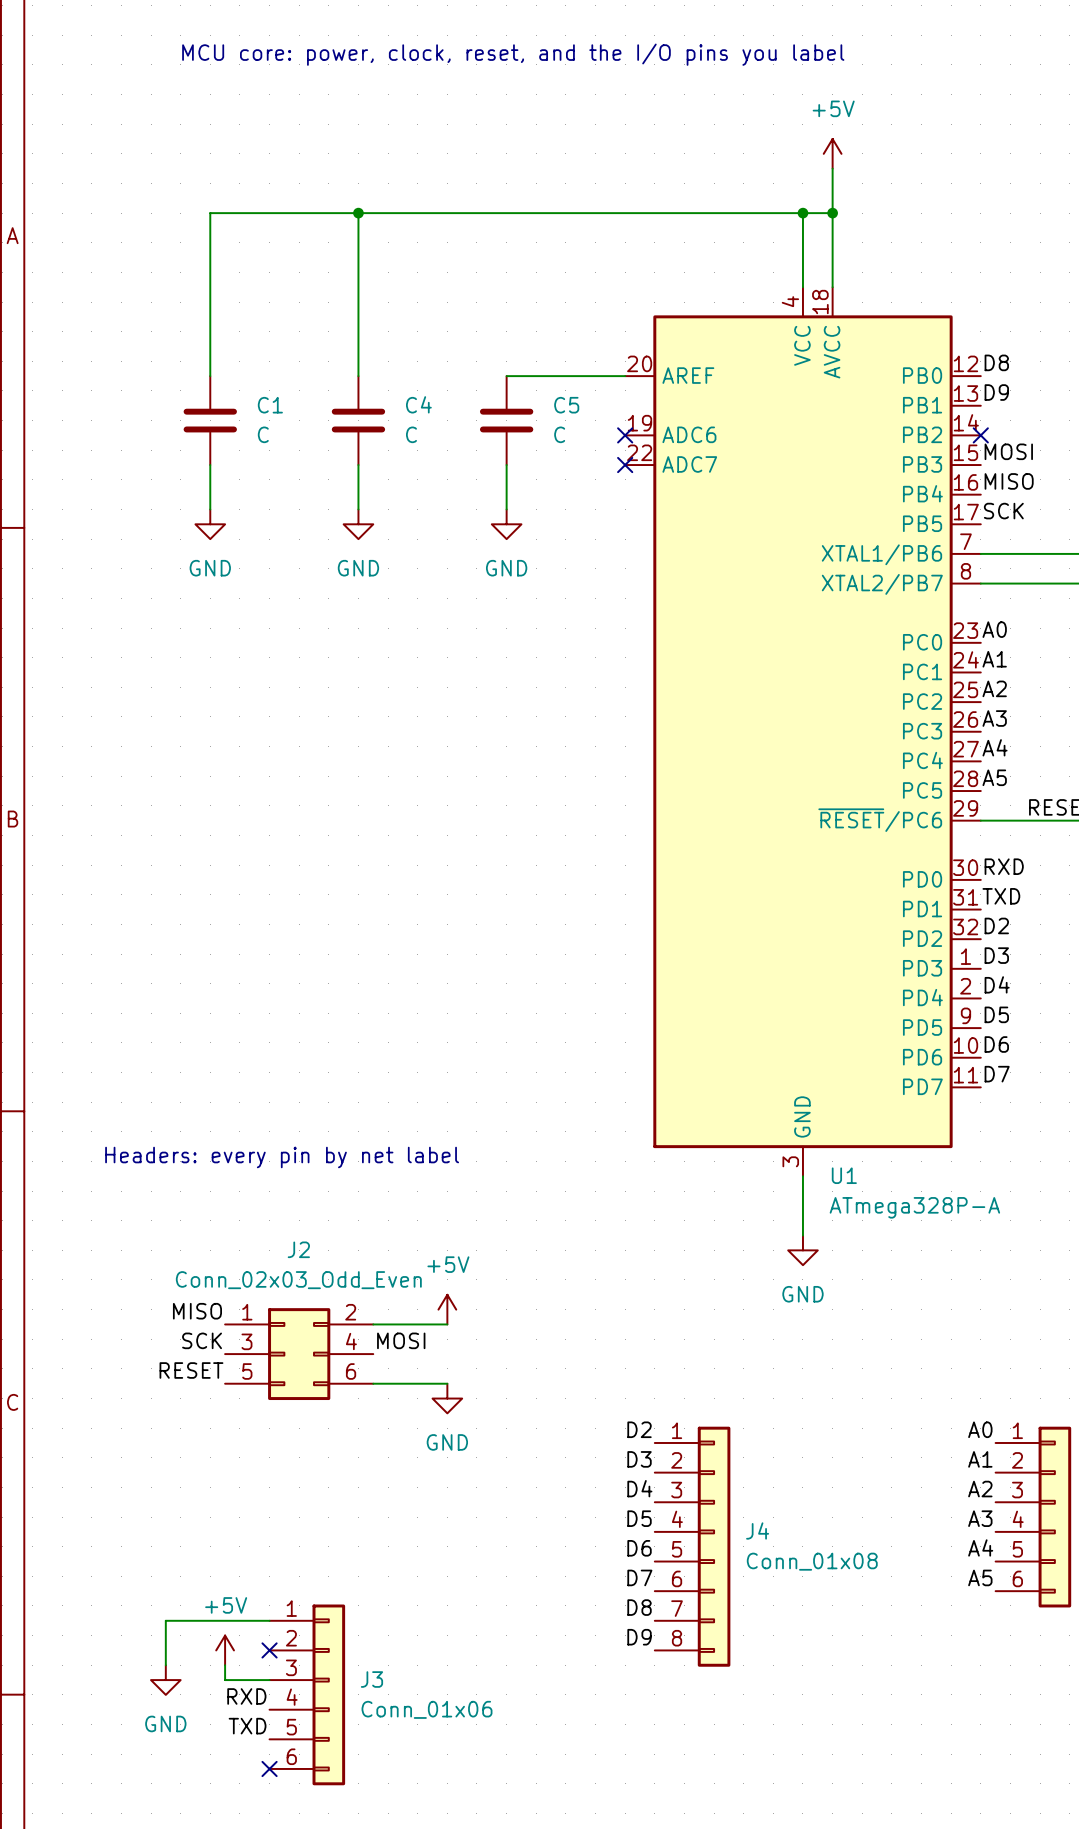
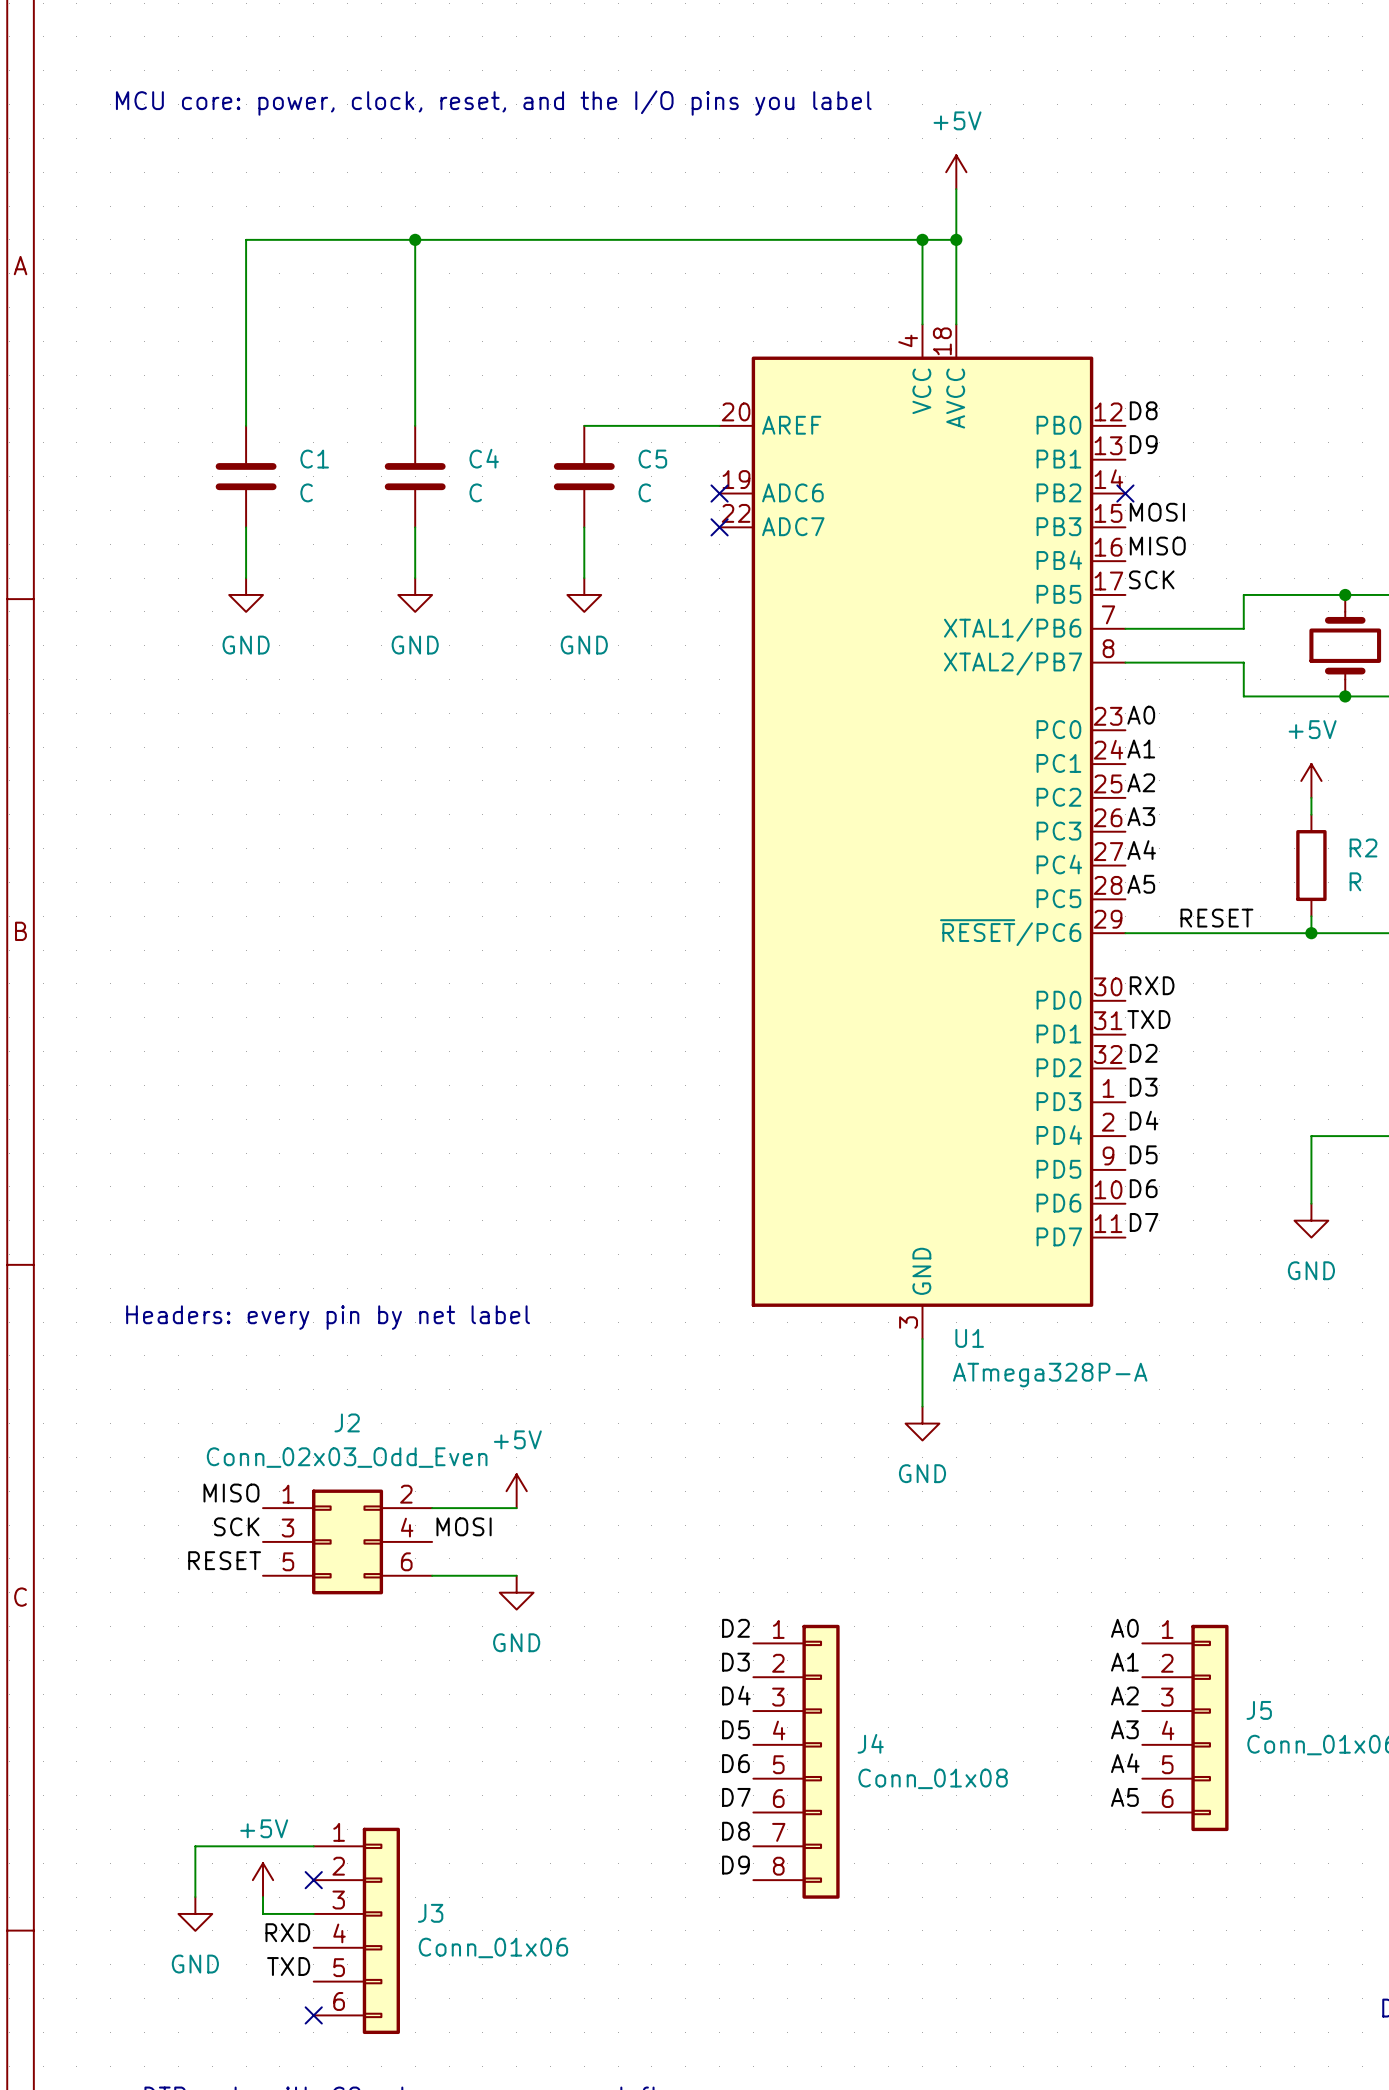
text position: MCU core: power, clock, reset, and the I/O pins you label (513, 54) -> MCU core: power, clock, reset, and the I/O pins you label (493, 103)

